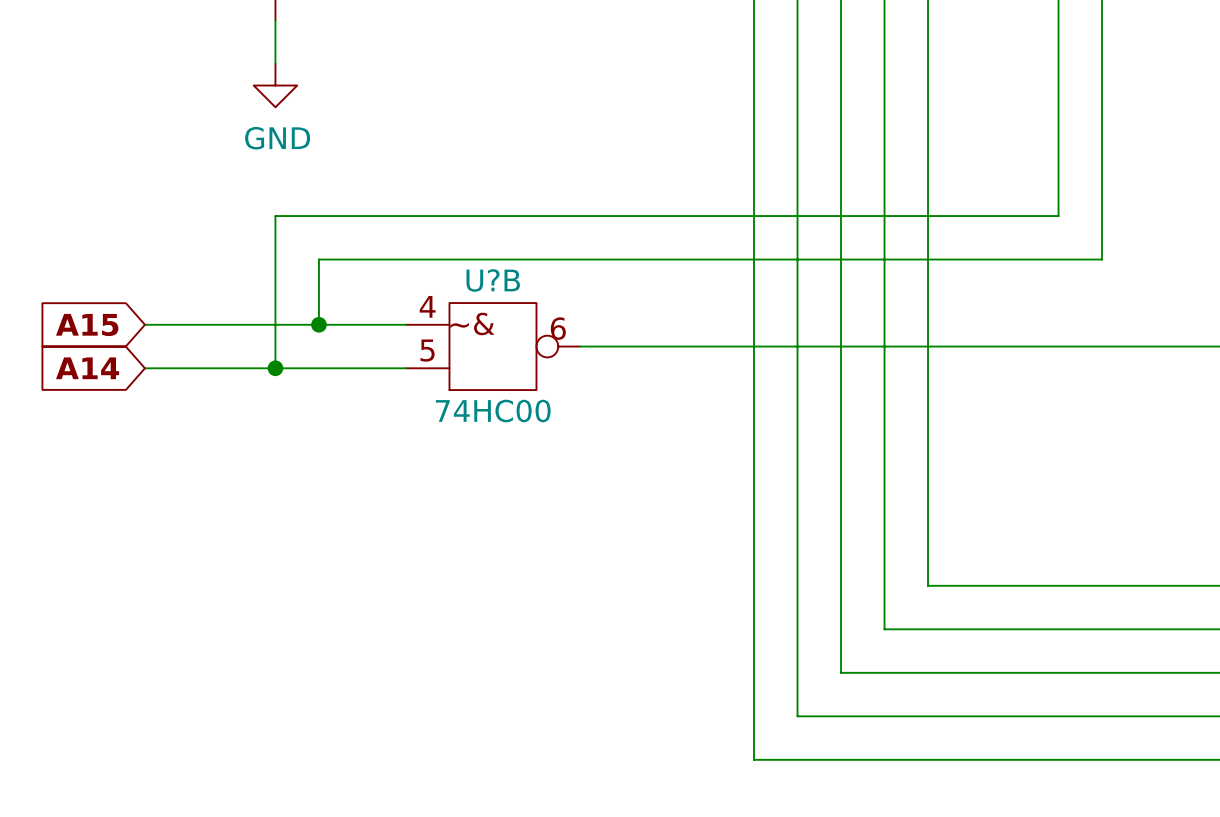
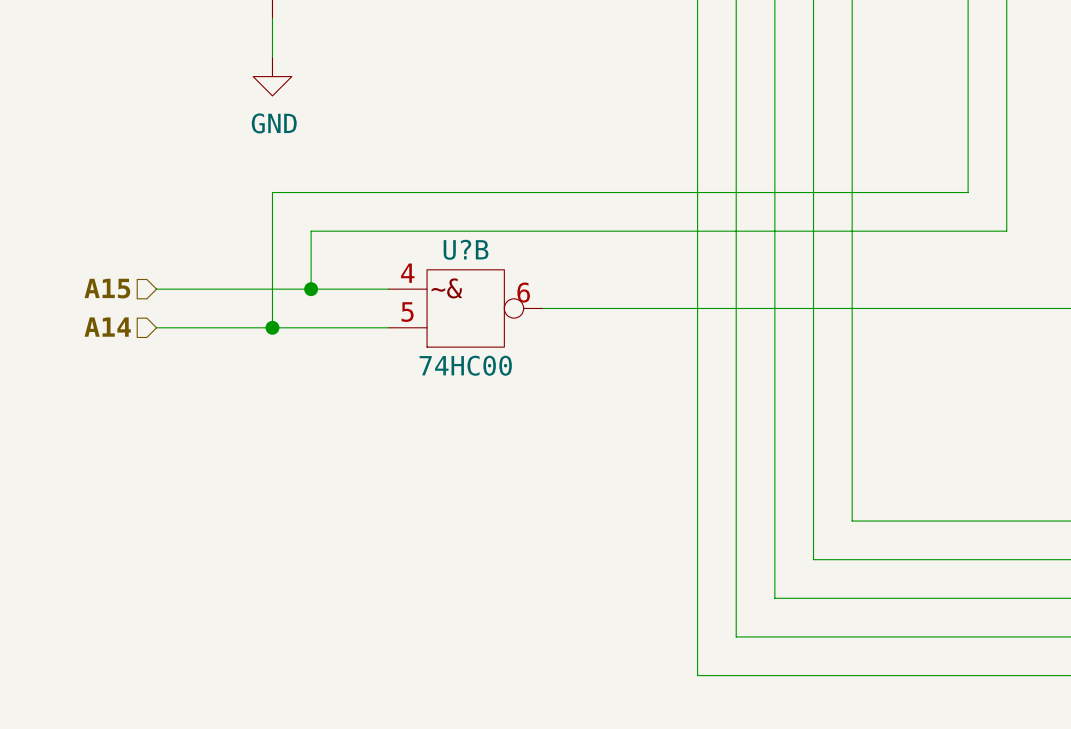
hierarchical label: none -> A15 (107, 288)
global label: A15 (87, 325) -> none
hierarchical label: none -> A14 (107, 327)
global label: A14 (87, 368) -> none

